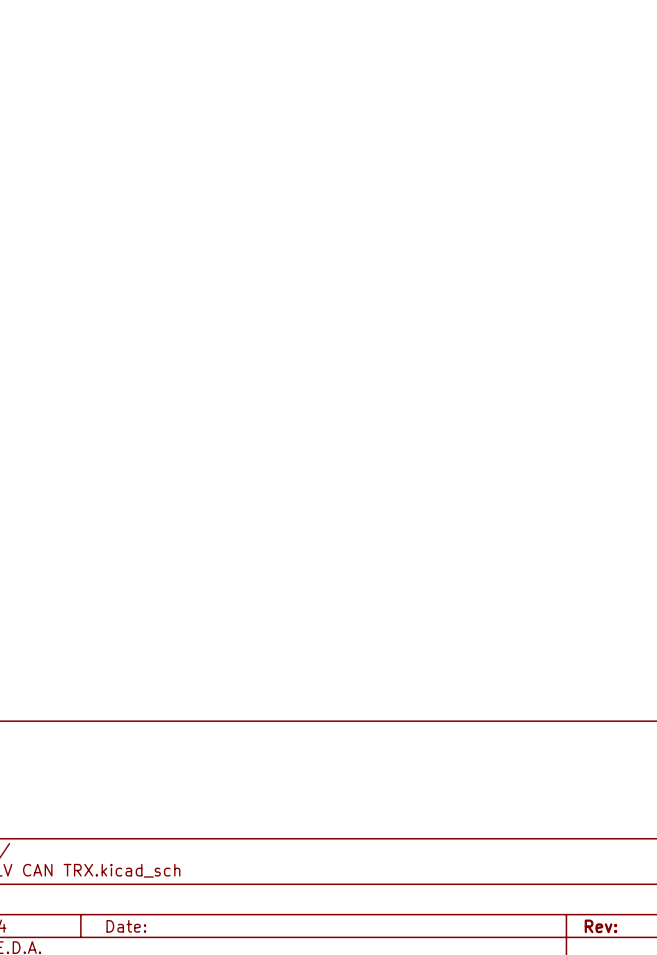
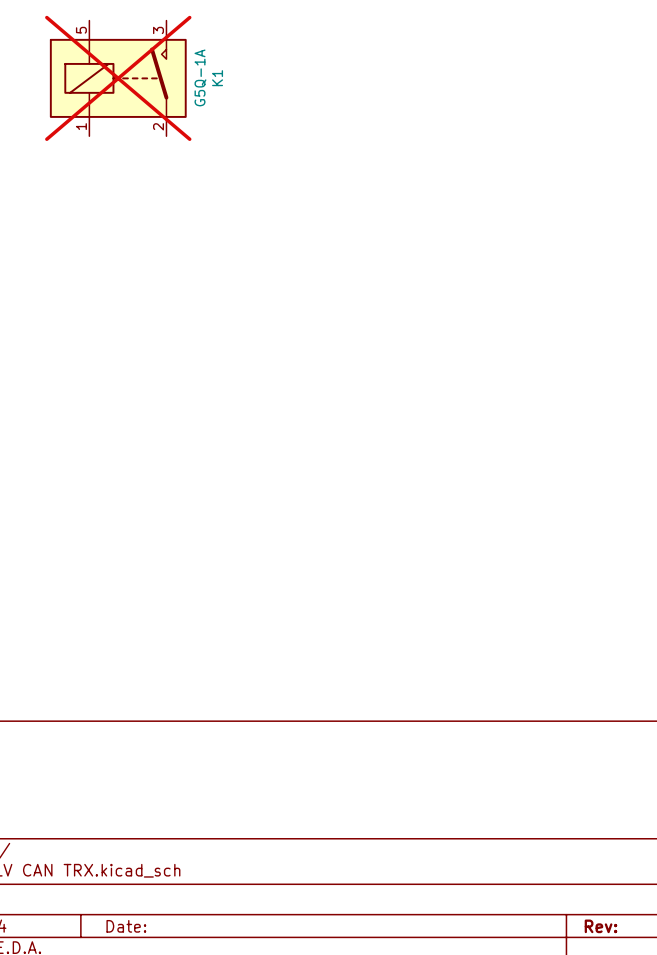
K1: none -> G5Q-1A (118, 78)

